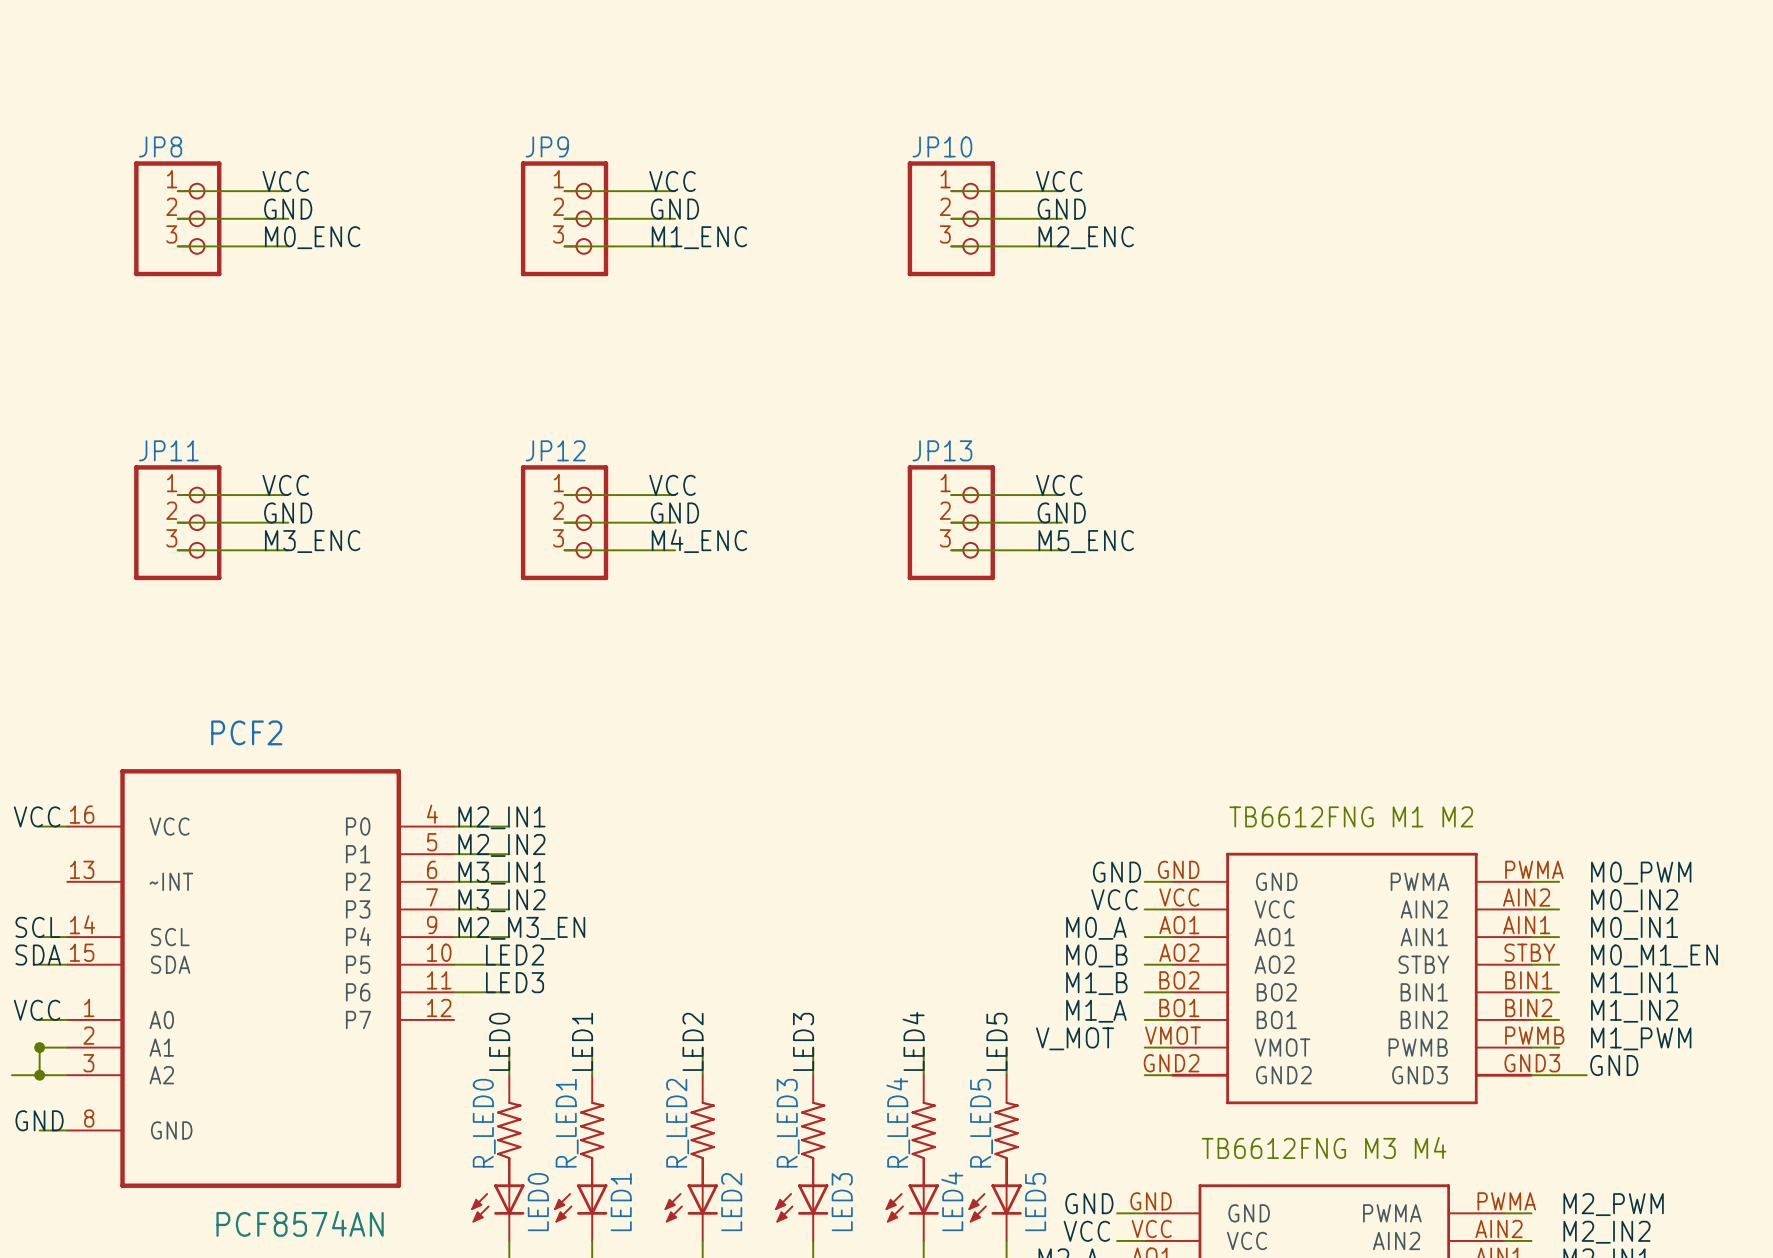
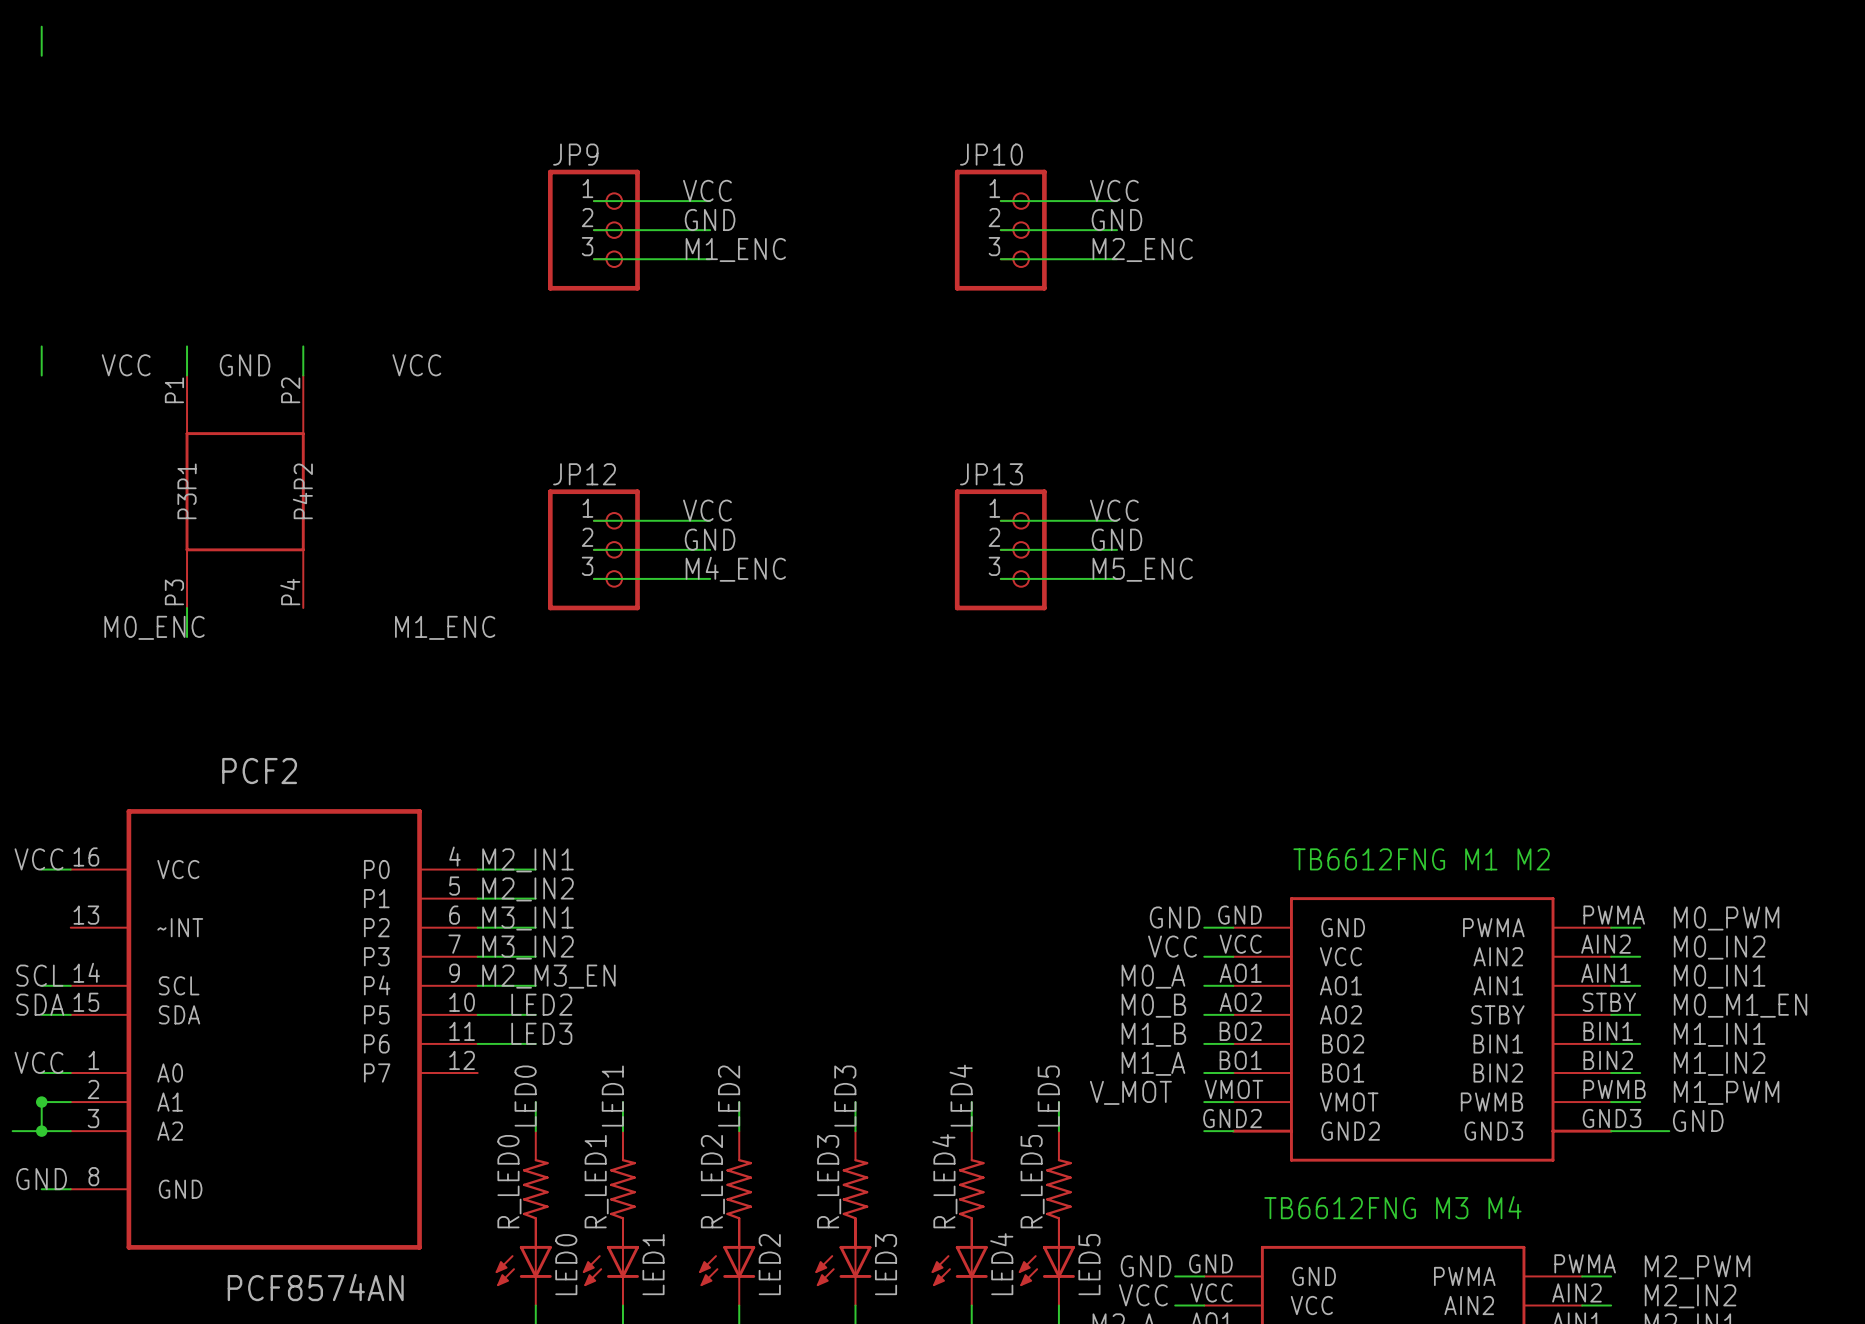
wire: none -> (41, 26) (41, 55)
label: VCC (285, 181) -> none
wire: (177, 191) (288, 191) -> none
label: GND (288, 209) -> none
wire: (177, 218) (288, 218) -> none
JP8: (177, 218) -> none
label: M0_ENC (312, 237) -> none
wire: (177, 246) (288, 246) -> none
wire: none -> (41, 346) (41, 375)
wire: none -> (187, 346) (187, 375)
wire: none -> (303, 346) (303, 375)
label: none -> VCC (126, 365)
label: none -> GND (245, 365)
label: none -> VCC (416, 365)
part: none -> (245, 491)
label: VCC (285, 485) -> none
wire: (177, 495) (288, 495) -> none
label: GND (288, 513) -> none
JP11: (177, 522) -> none
label: M3_ENC (312, 541) -> none
wire: (177, 550) (288, 550) -> none
wire: none -> (187, 607) (187, 637)
label: none -> M0_ENC (154, 627)
label: none -> M1_ENC (445, 627)

